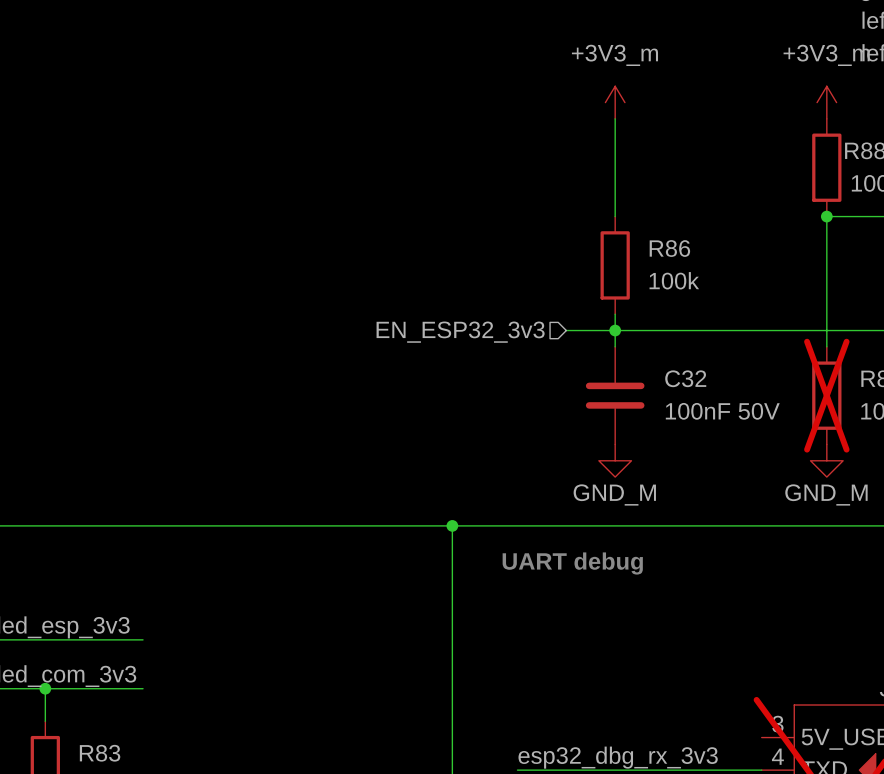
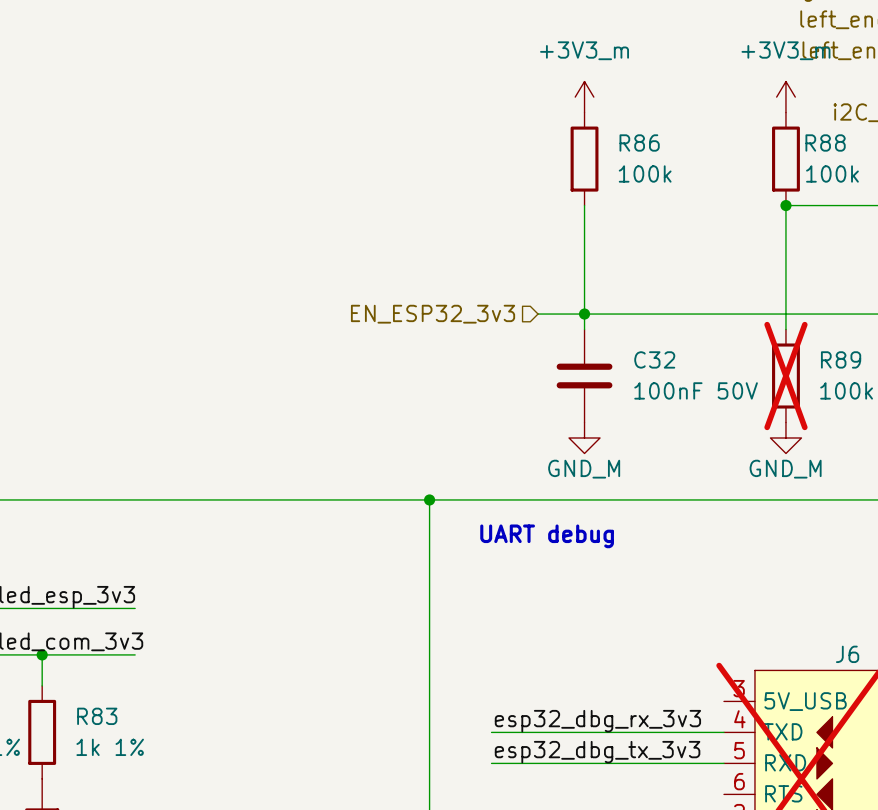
wire: (615, 118) (615, 216) -> (584, 298) (584, 205)
R86 position: (615, 265) -> (584, 159)

